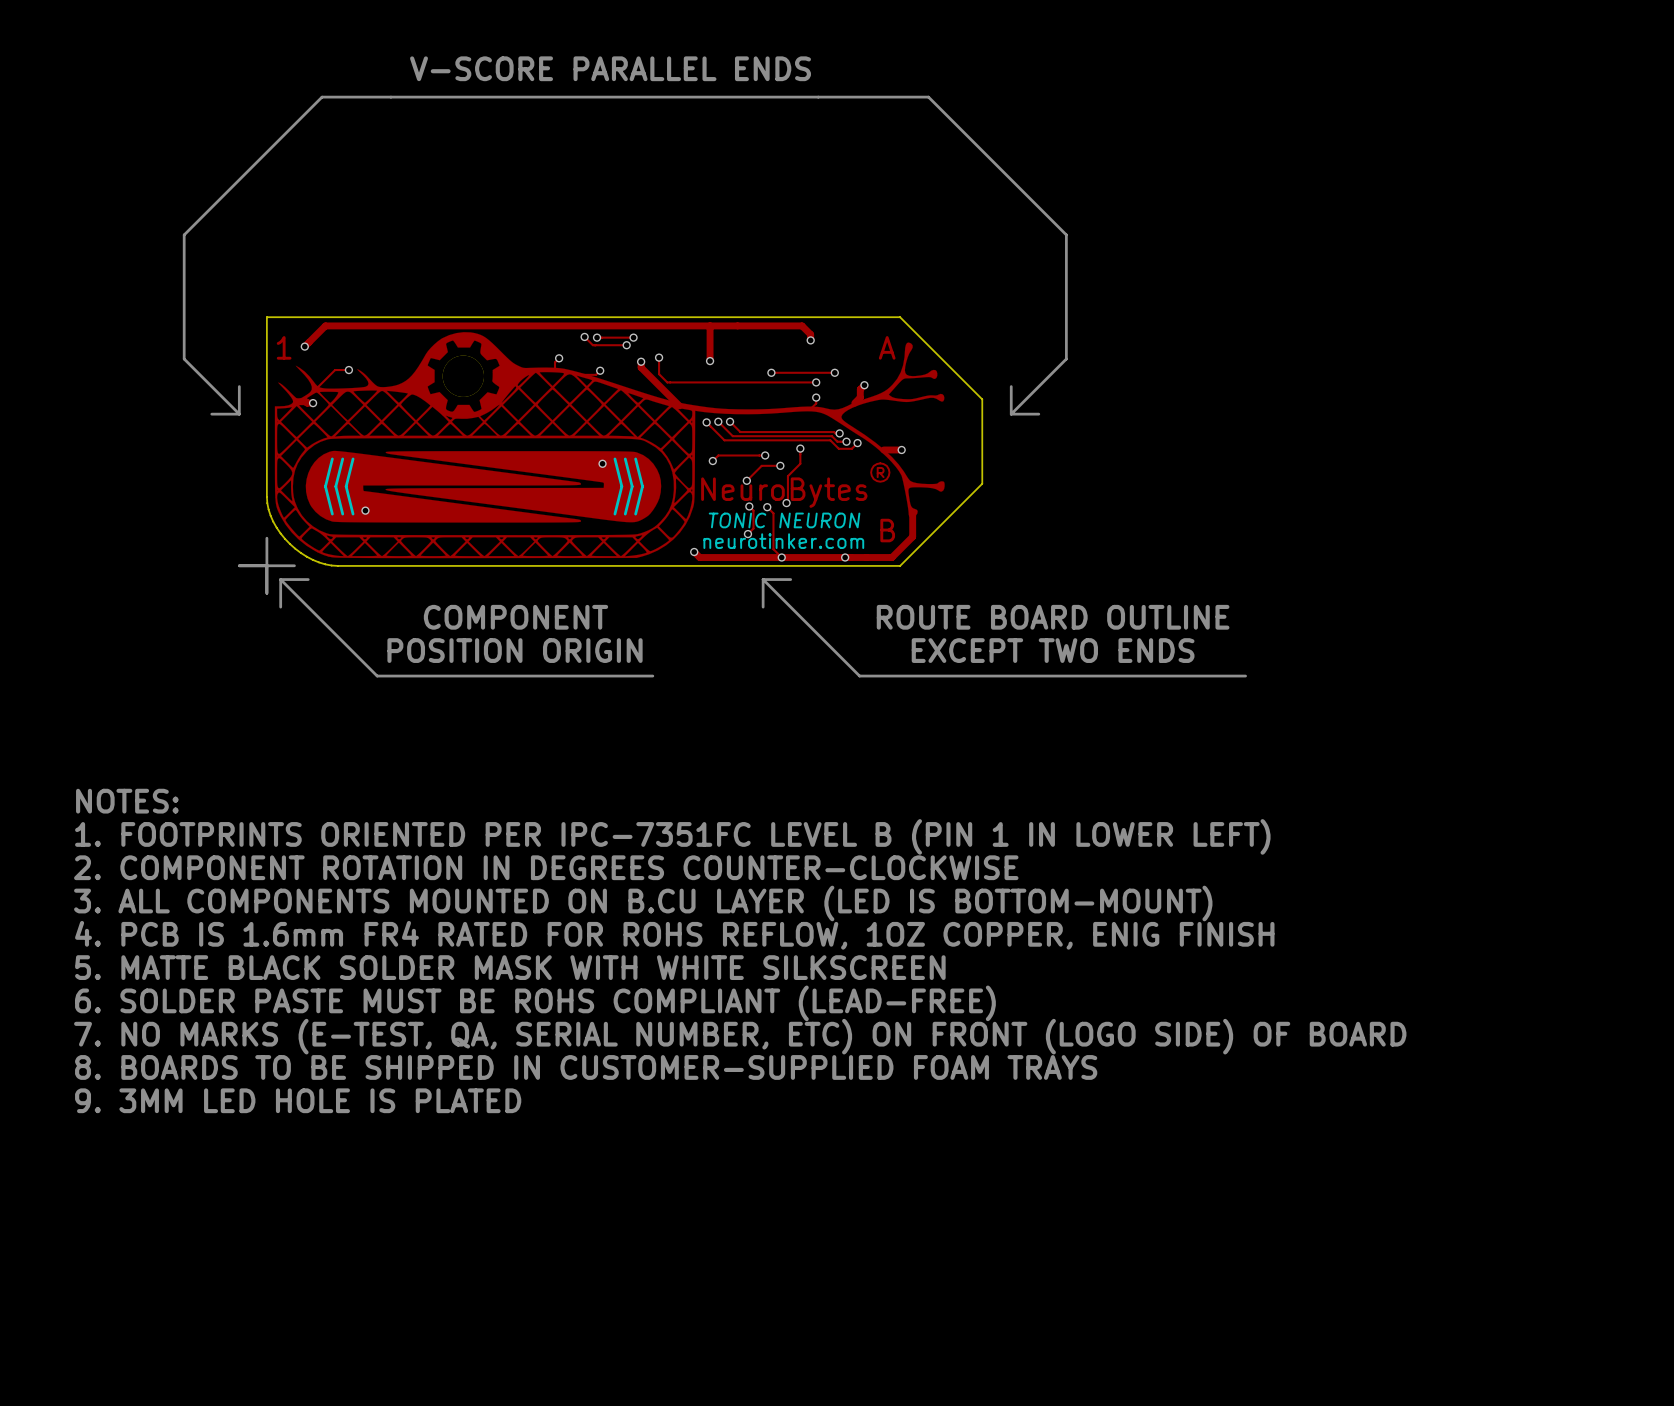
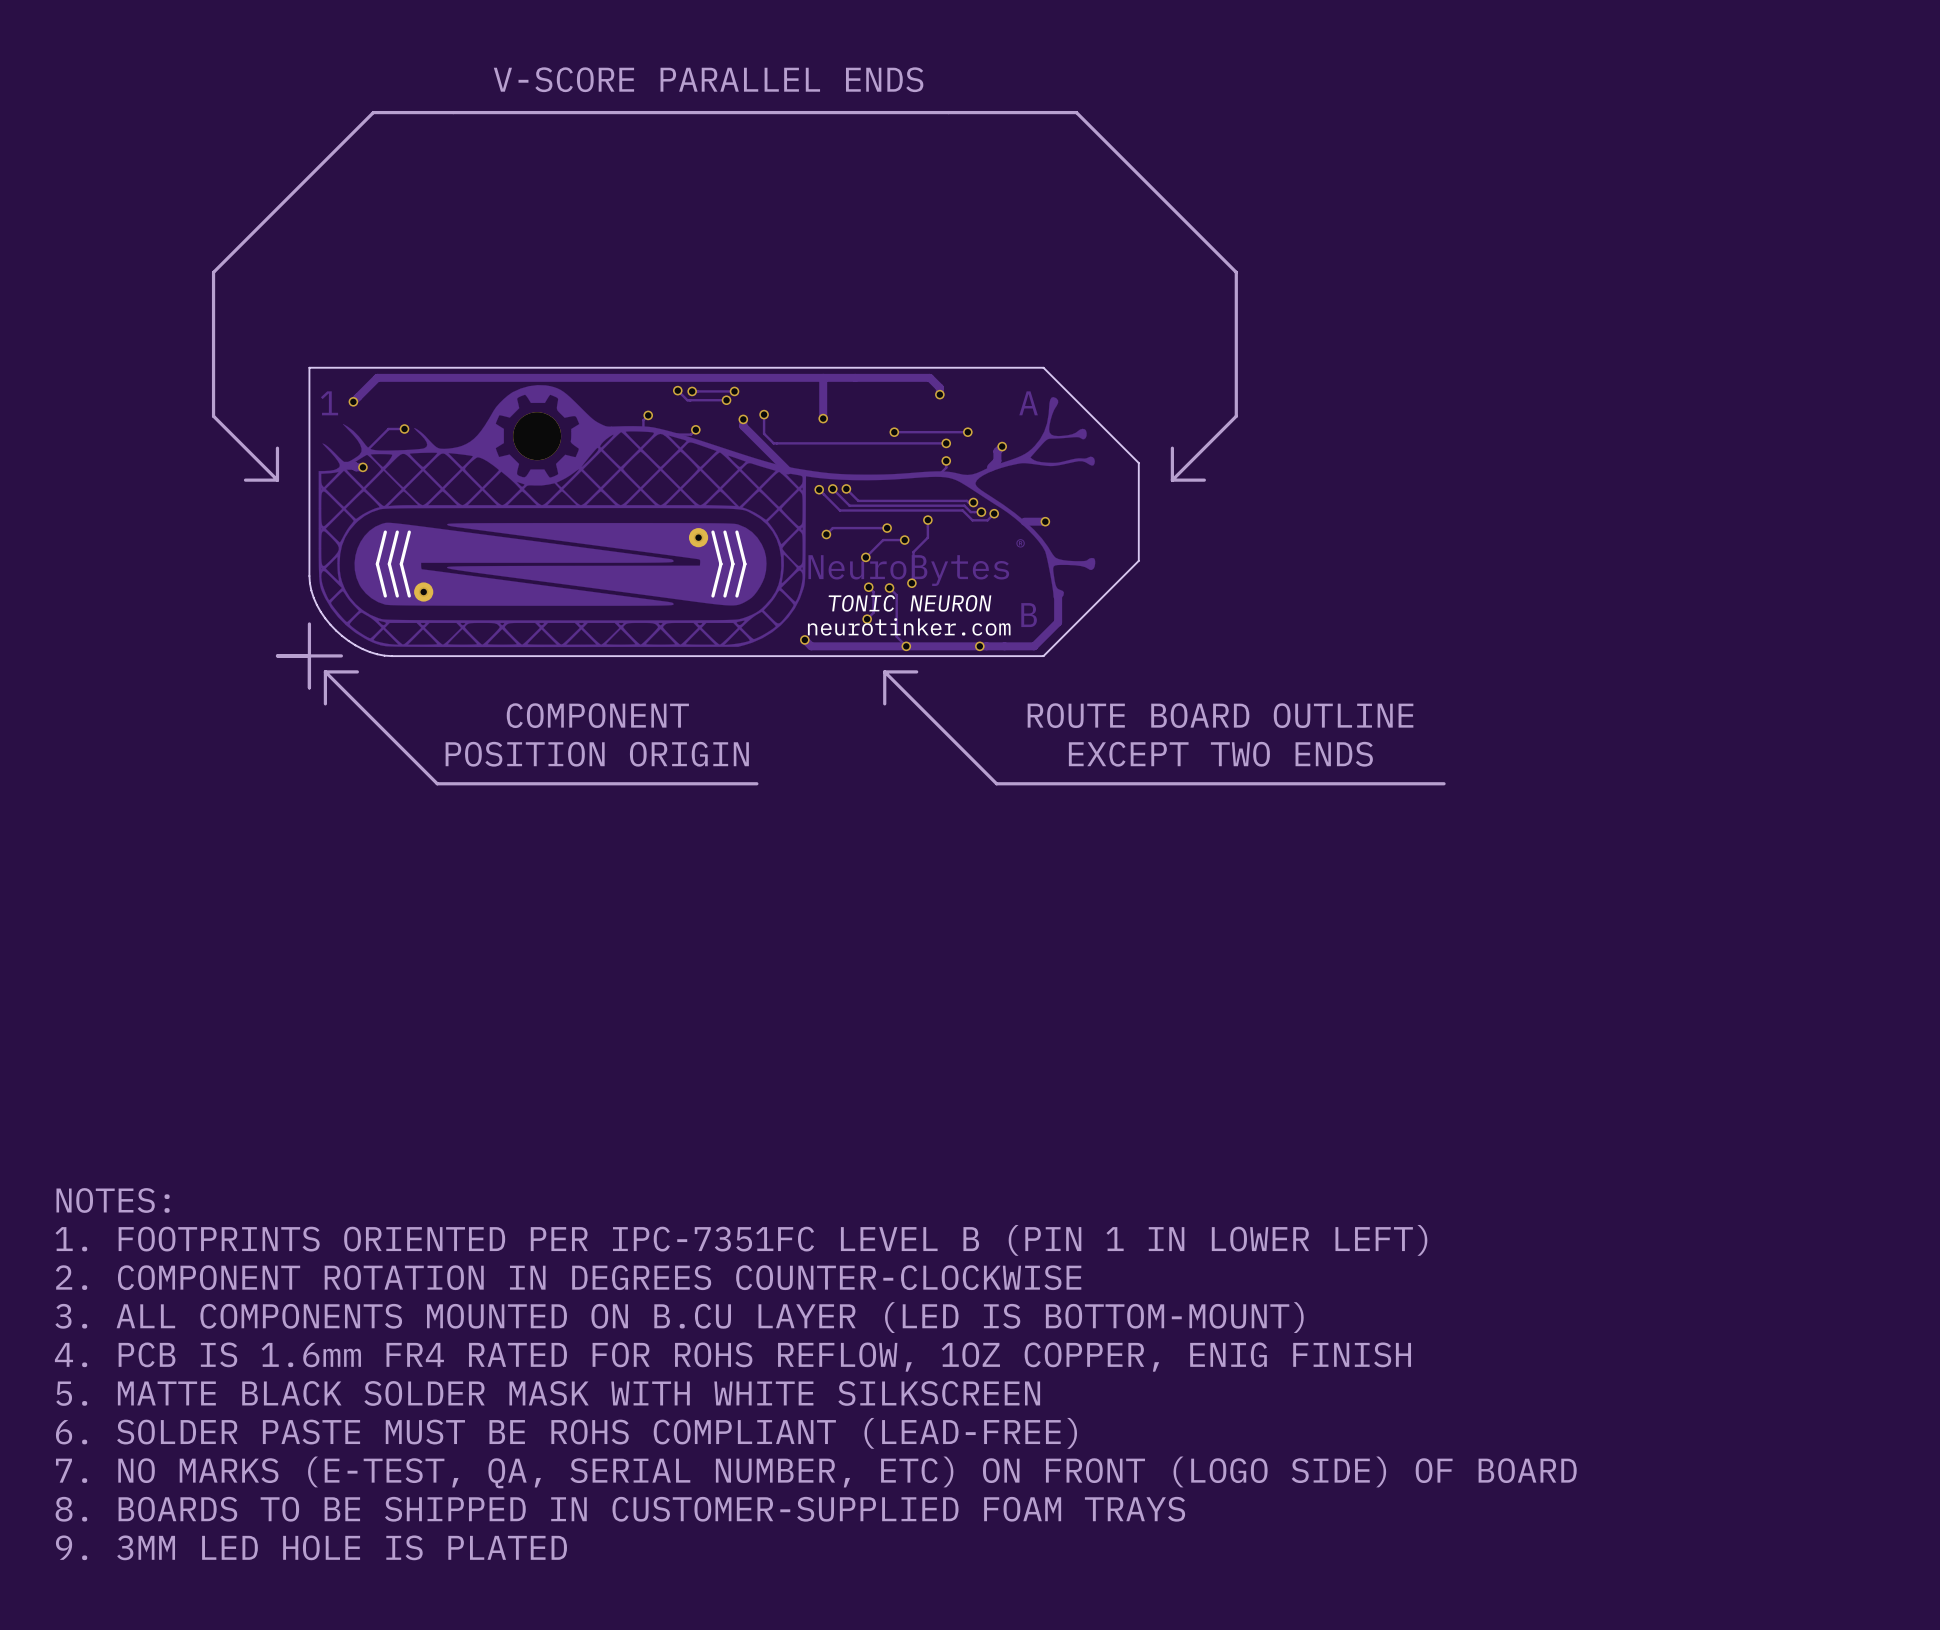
text position: NOTES: (127, 801) -> NOTES: (113, 1200)
text position: 1. FOOTPRINTS ORIENTED PER IPC-7351FC LEVEL B (PIN 1 IN LOWER LEFT) (672, 836) -> 1. FOOTPRINTS ORIENTED PER IPC-7351FC LEVEL B (PIN 1 IN LOWER LEFT) (741, 1240)
text position: 2. COMPONENT ROTATION IN DEGREES COUNTER-CLOCKWISE (546, 867) -> 2. COMPONENT ROTATION IN DEGREES COUNTER-CLOCKWISE (568, 1277)
text position: 3. ALL COMPONENTS MOUNTED ON B.CU LAYER (LED IS BOTTOM-MOUNT) (643, 903) -> 3. ALL COMPONENTS MOUNTED ON B.CU LAYER (LED IS BOTTOM-MOUNT) (679, 1317)
text position: 4. PCB IS 1.6mm FR4 RATED FOR ROHS REFLOW, 1OZ COPPER, ENIG FINISH (674, 935) -> 4. PCB IS 1.6mm FR4 RATED FOR ROHS REFLOW, 1OZ COPPER, ENIG FINISH (732, 1357)
text position: 5. MATTE BLACK SOLDER MASK WITH WHITE SILKSCREEN (510, 967) -> 5. MATTE BLACK SOLDER MASK WITH WHITE SILKSCREEN (548, 1393)
text position: 6. SOLDER PASTE MUST BE ROHS COMPLIANT (LEAD-FREE) (535, 1003) -> 6. SOLDER PASTE MUST BE ROHS COMPLIANT (LEAD-FREE) (566, 1433)
text position: 7. NO MARKS (E-TEST, QA, SERIAL NUMBER, ETC) ON FRONT (LOGO SIDE) OF BOARD (740, 1036) -> 7. NO MARKS (E-TEST, QA, SERIAL NUMBER, ETC) ON FRONT (LOGO SIDE) OF BOARD (816, 1472)
text position: 8. BOARDS TO BE SHIPPED IN CUSTOMER-SUPPLIED FOAM TRAYS (586, 1067) -> 8. BOARDS TO BE SHIPPED IN CUSTOMER-SUPPLIED FOAM TRAYS (620, 1509)
text position: 9. 3MM LED HOLE IS PLATED (298, 1100) -> 9. 3MM LED HOLE IS PLATED (311, 1547)

